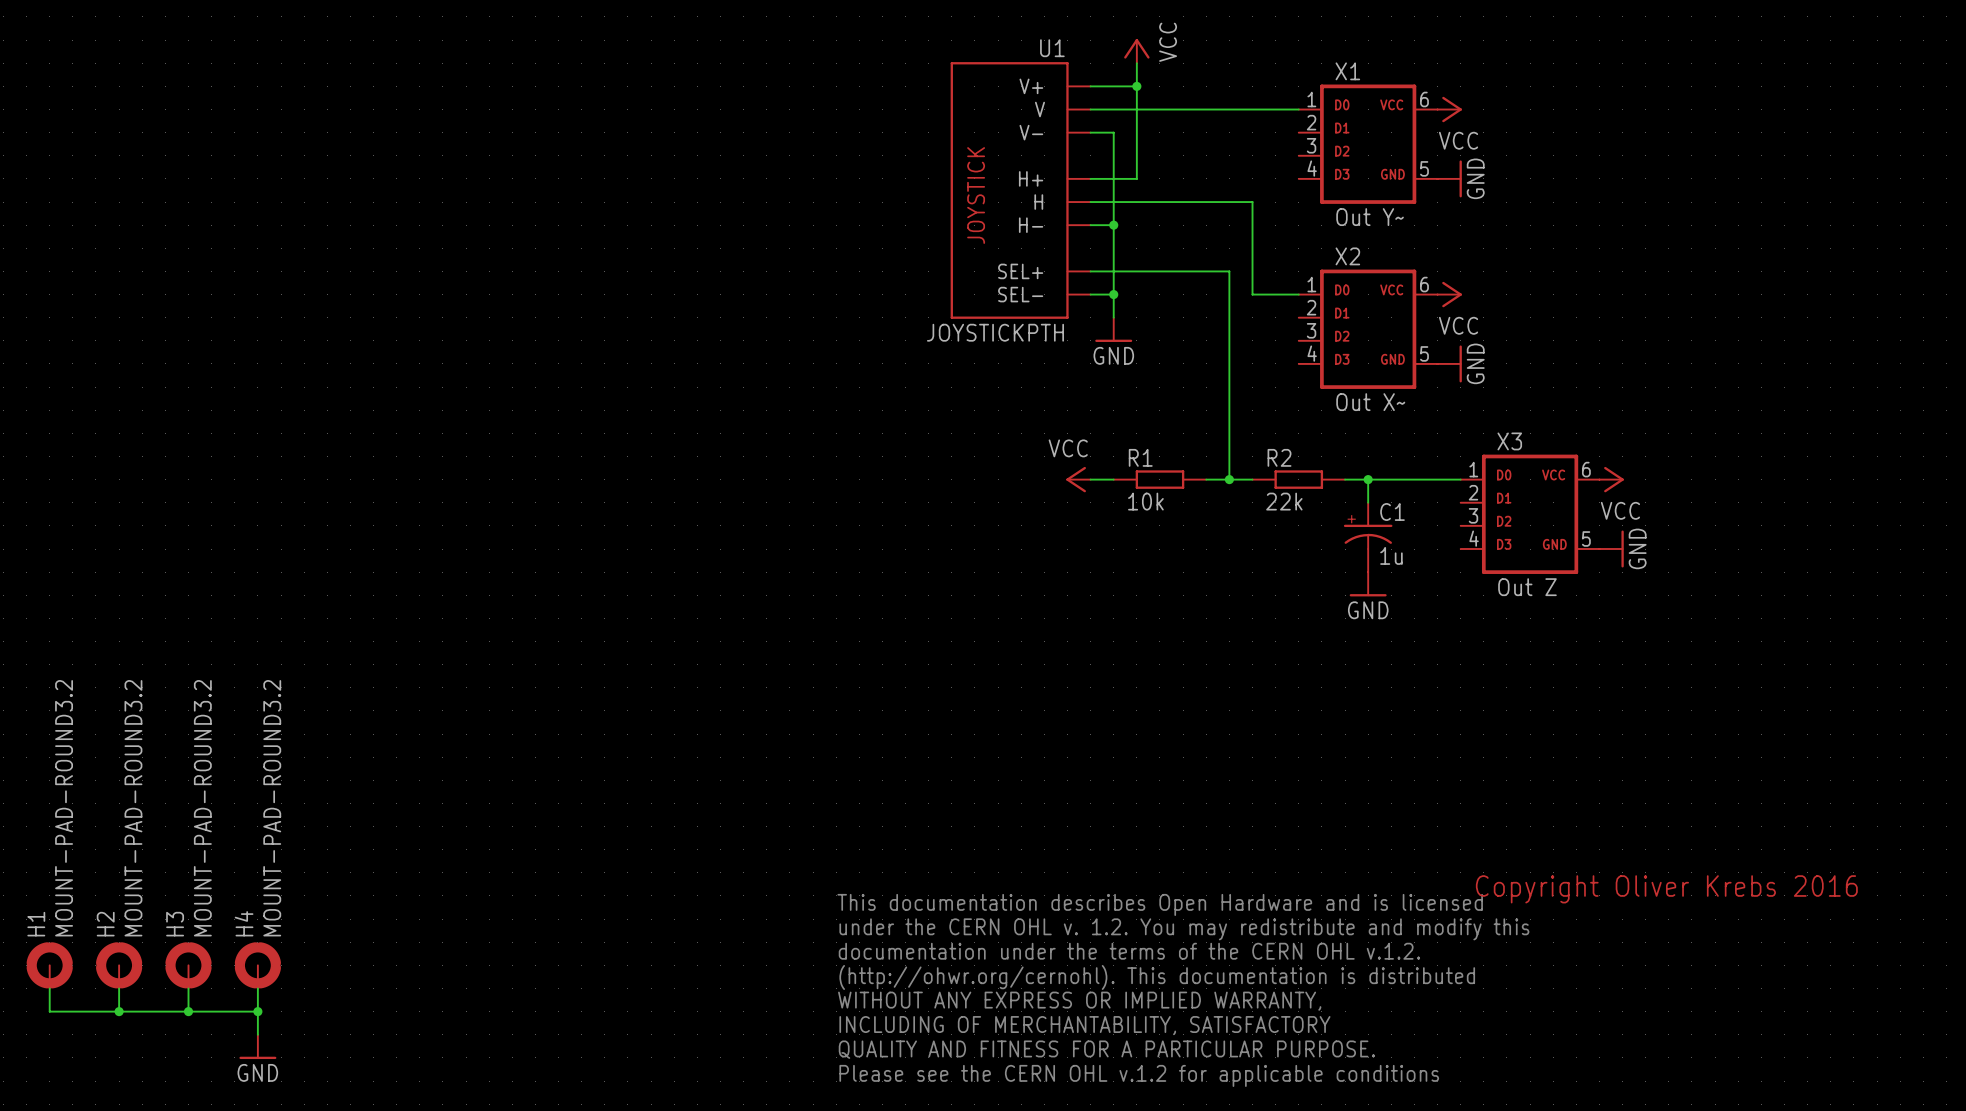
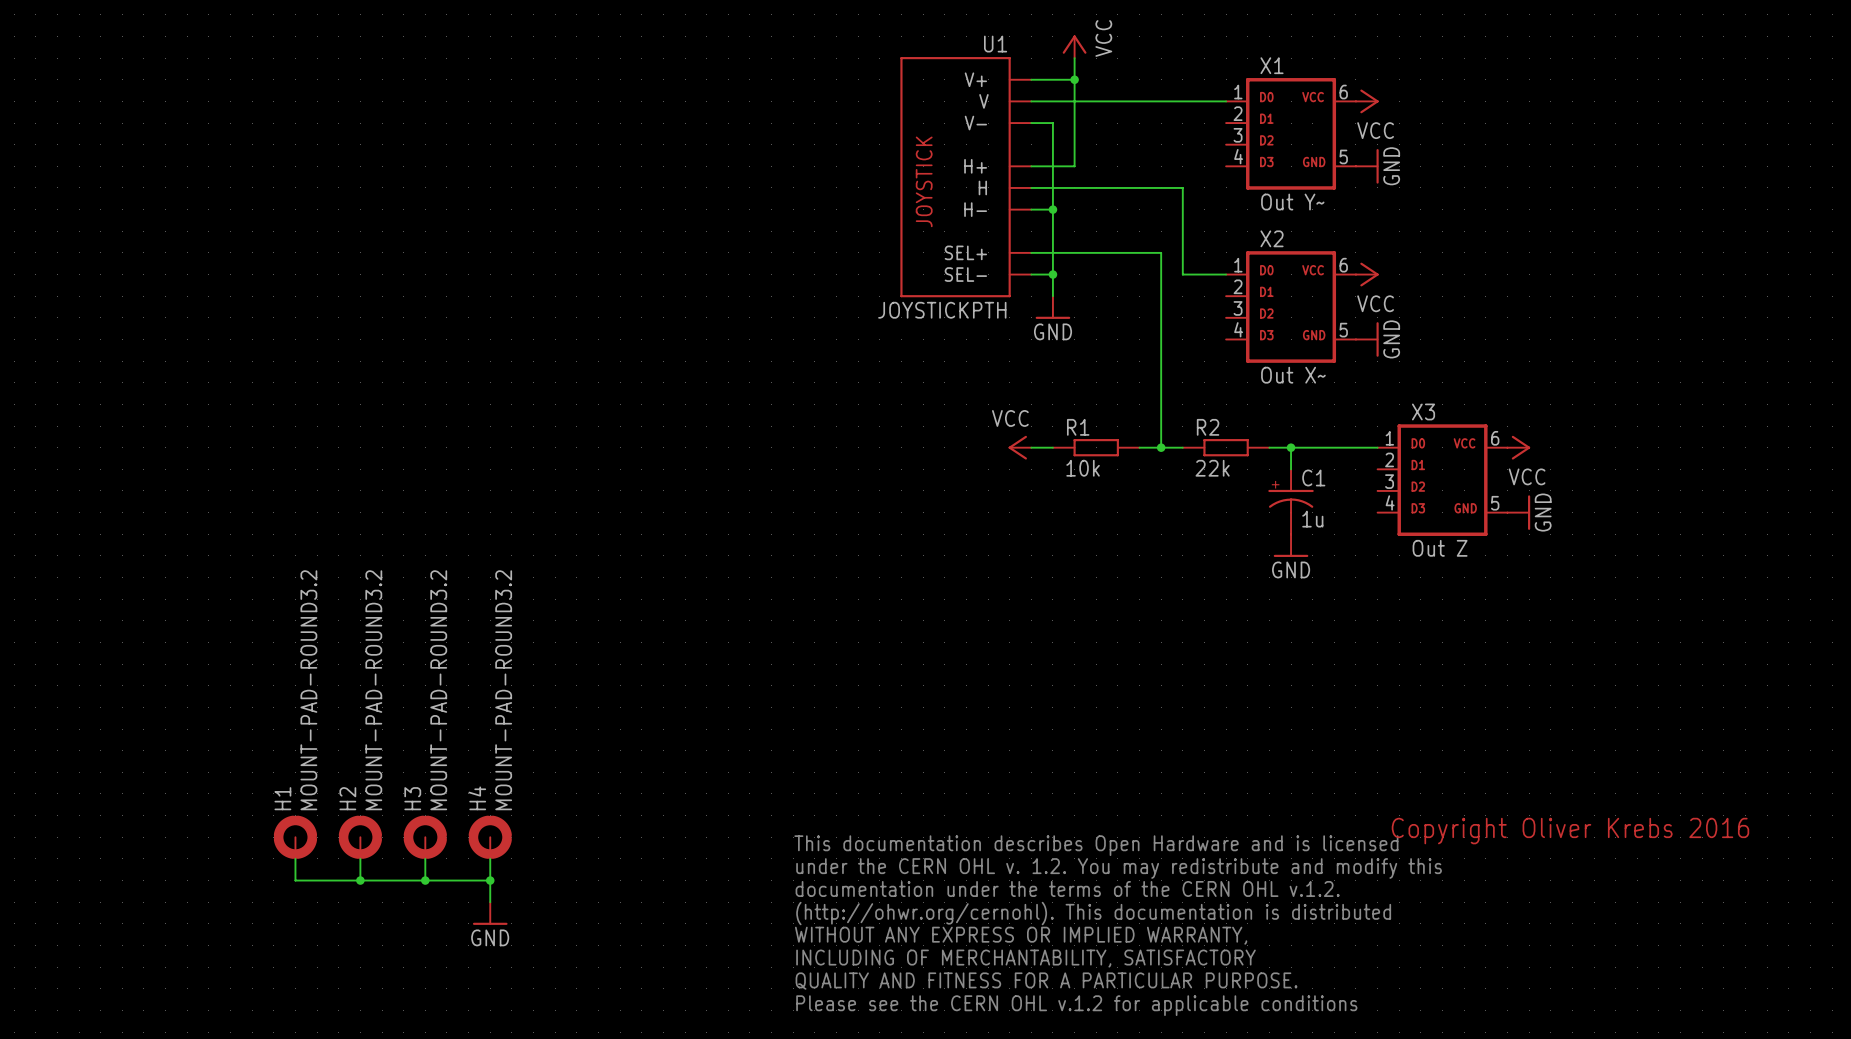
wire: none -> (295, 858) (295, 880) (490, 880)
wire: none -> (425, 858) (425, 880)
wire: none -> (490, 858) (490, 902)
junction: none -> (360, 880)
junction: none -> (425, 880)
junction: none -> (490, 880)
H1 position: (49, 965) -> (295, 837)
H2 position: (119, 965) -> (360, 837)
H3 position: (188, 965) -> (425, 837)
H4 position: (257, 965) -> (490, 837)
power symbol: none -> GND (490, 913)
wire: (49, 988) (49, 1011) (257, 1011) -> none
wire: (119, 988) (119, 1011) -> none
wire: (188, 988) (188, 1011) -> (360, 858) (360, 880)
wire: (257, 988) (257, 1034) -> none
junction: (119, 1011) -> none
junction: (188, 1011) -> none
junction: (257, 1011) -> none
power symbol: GND (257, 1046) -> none

